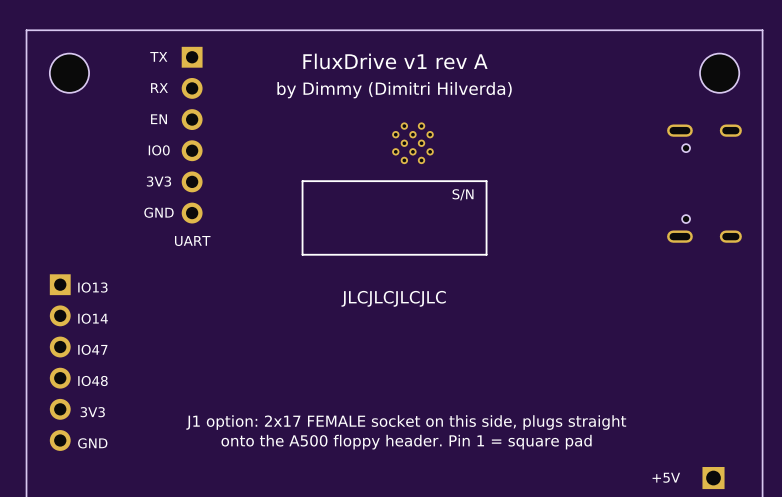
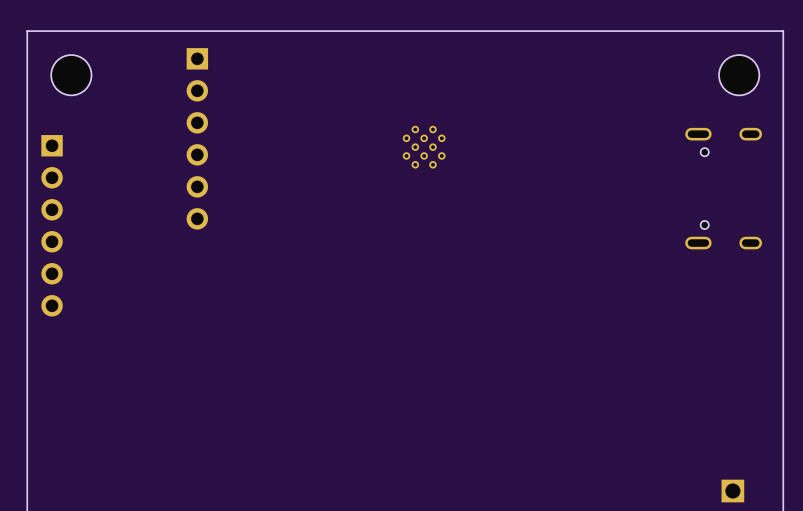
text: TX (158, 56) -> none
text: FluxDrive v1 rev A (395, 61) -> none
text: RX (159, 88) -> none
text: by Dimmy (Dimitri Hilverda) (394, 90) -> none
text: EN (159, 119) -> none
text: IO0 (159, 150) -> none
text: 3V3 (158, 181) -> none
line: (486, 181) (302, 181) (302, 254) (486, 254) (486, 181) -> none
text: S/N (463, 194) -> none
text: GND (158, 212) -> none
text: UART (192, 241) -> none
text: IO13 (92, 287) -> none
text: JLCJLCJLCJLC (393, 298) -> none
text: IO14 (93, 318) -> none
text: IO47 (92, 349) -> none
part position: (60, 362) -> (52, 225)
text: IO48 (92, 381) -> none
text: 3V3 (92, 412) -> none
text: J1 option: 2x17 FEMALE socket on this side, plugs straight (406, 422) -> none
text: onto the A500 floppy header. Pin 1 = square pad (406, 442) -> none
text: GND (92, 443) -> none
text: +5V (666, 477) -> none

